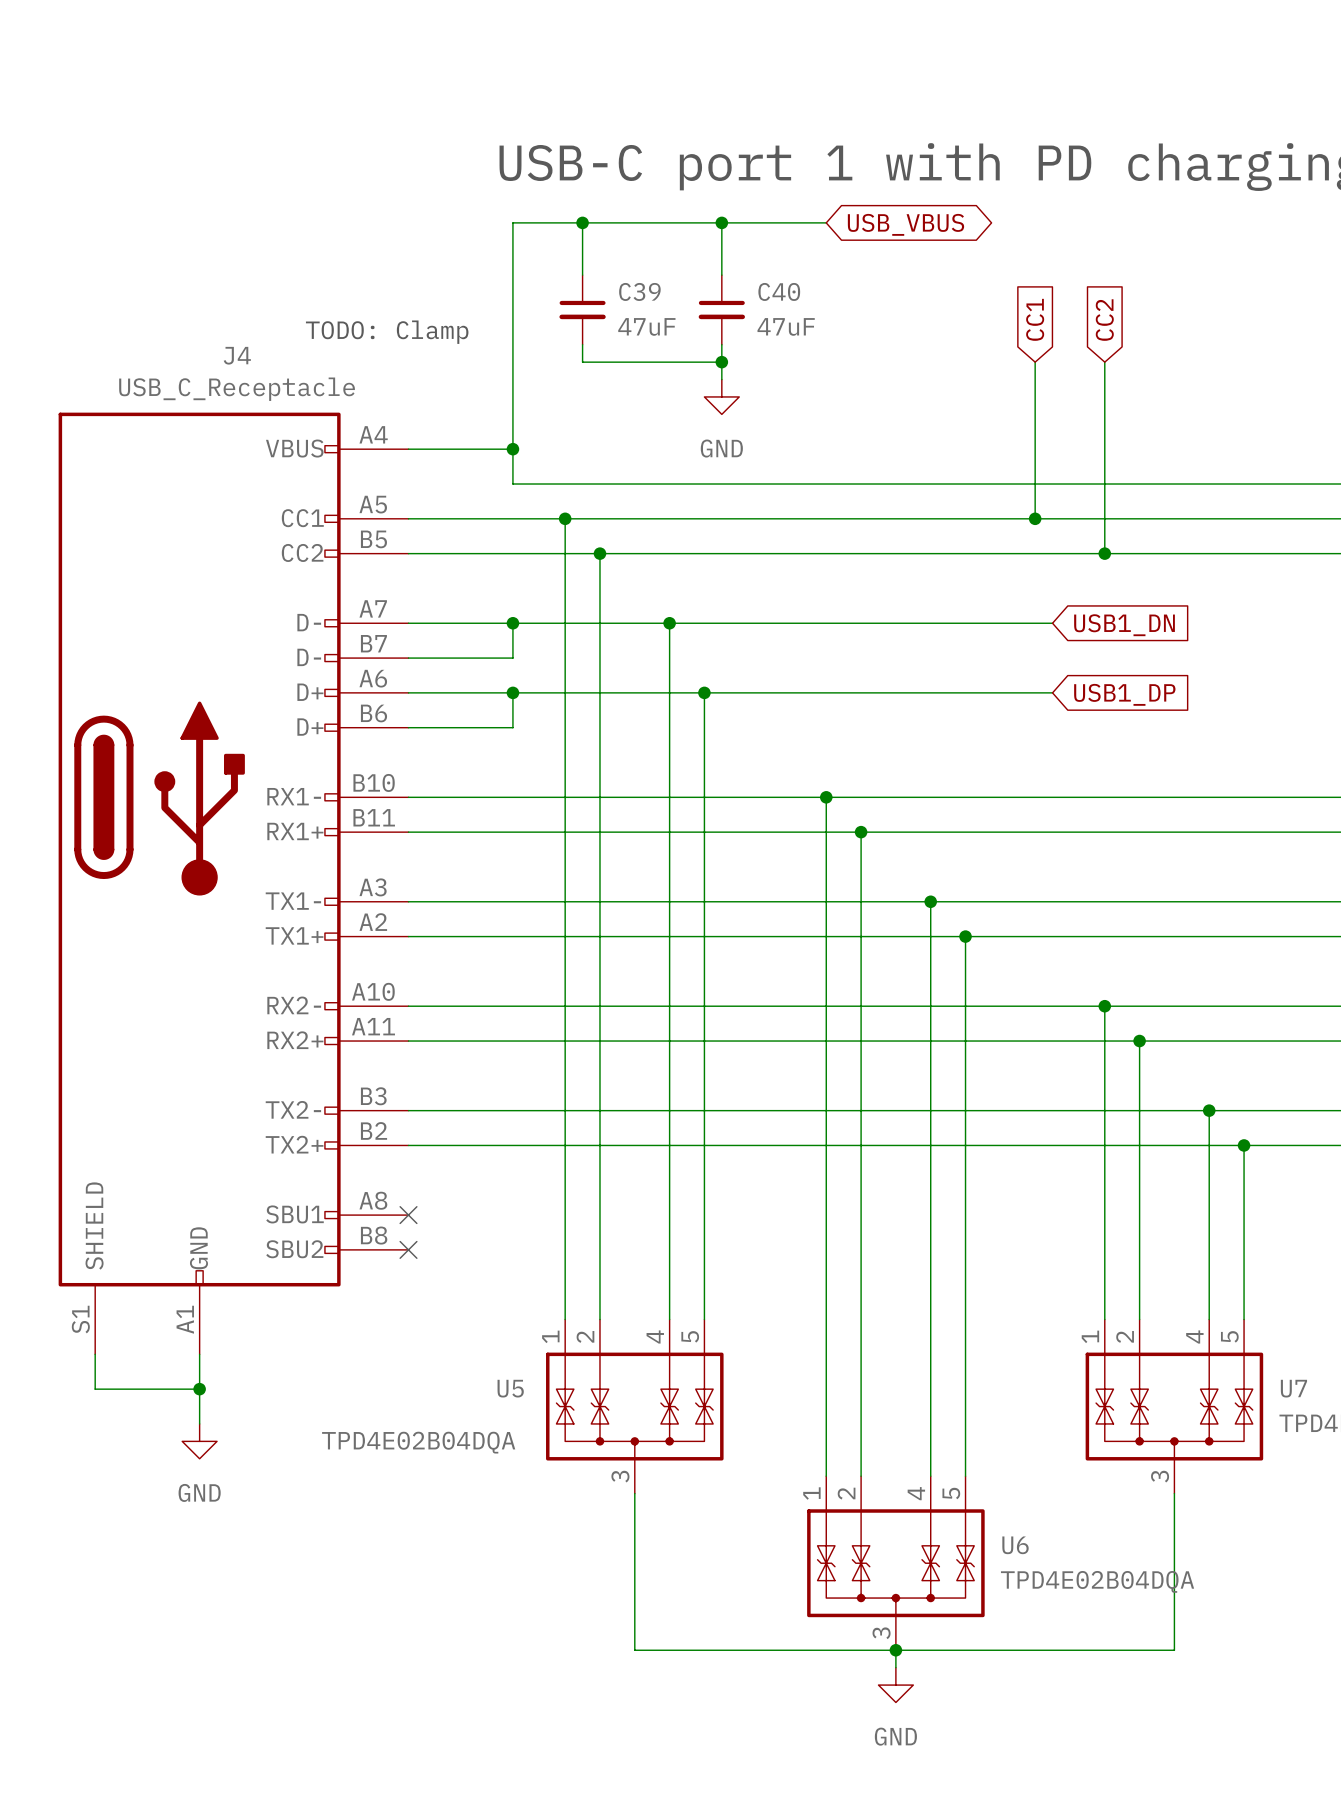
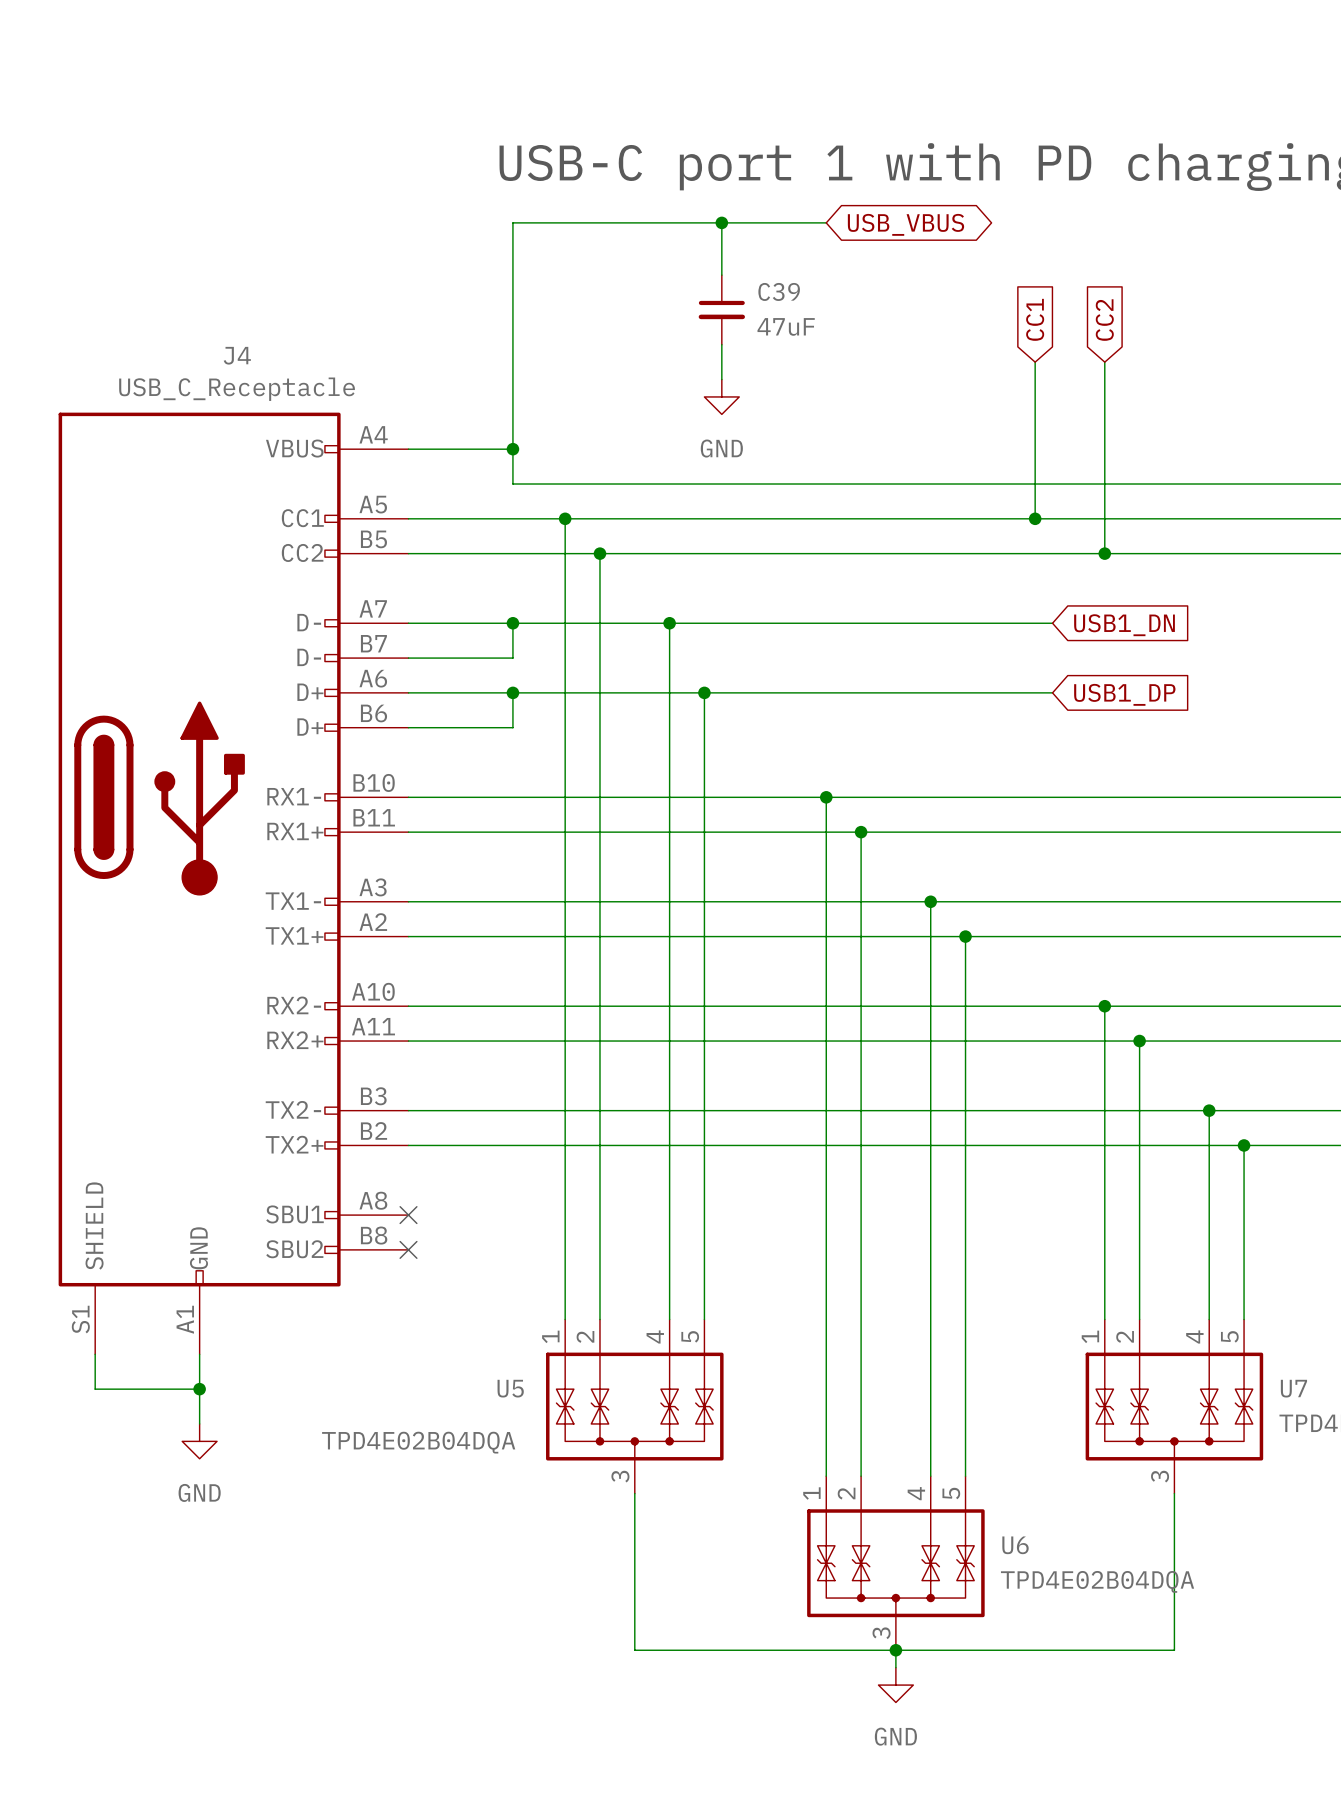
wire: (582, 222) (582, 275) -> none
junction: (582, 222) -> none
C40 name: C40 (779, 291) -> C39 (779, 291)
C39: 47uF (582, 309) -> none
text: TODO: Clamp (387, 332) -> none
wire: (582, 344) (582, 362) (721, 362) -> none
junction: (721, 362) -> none

